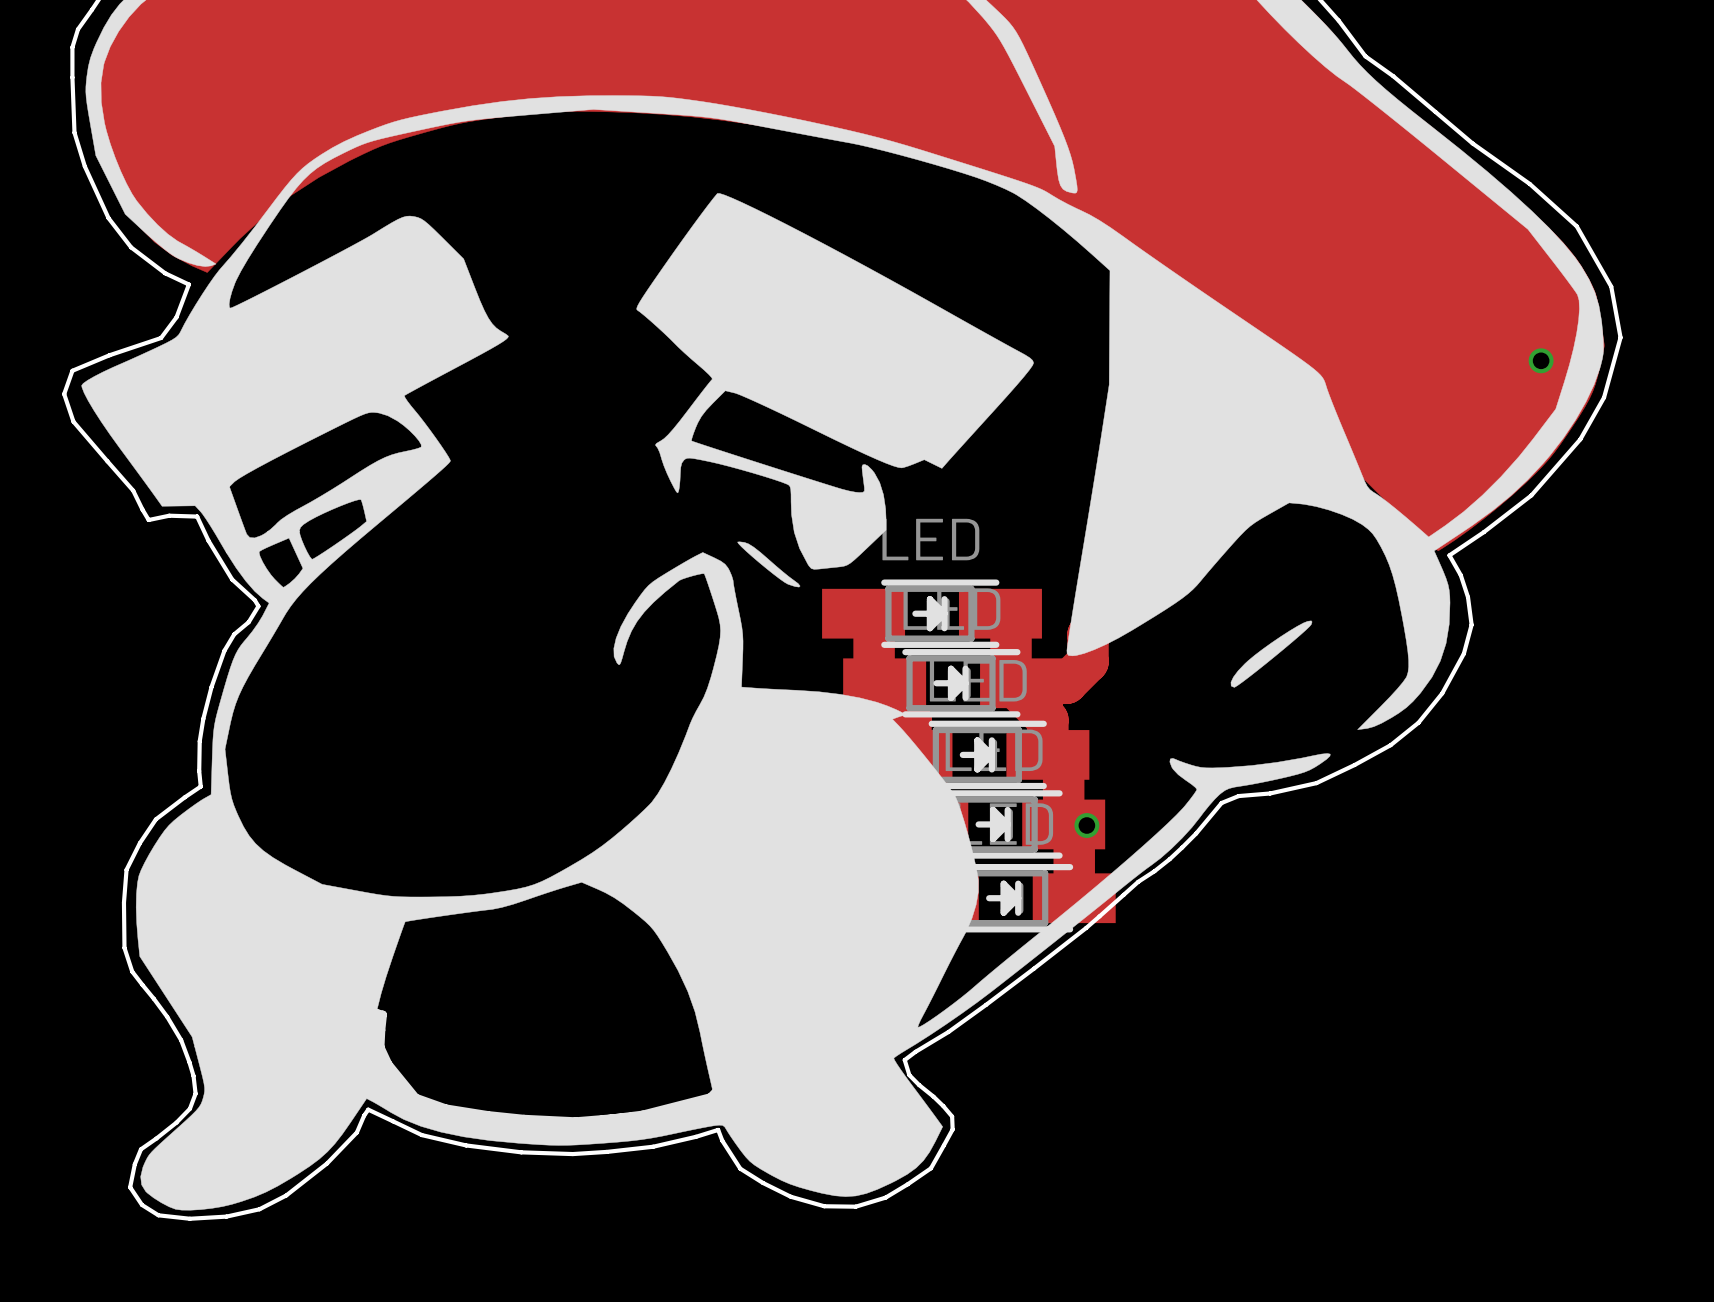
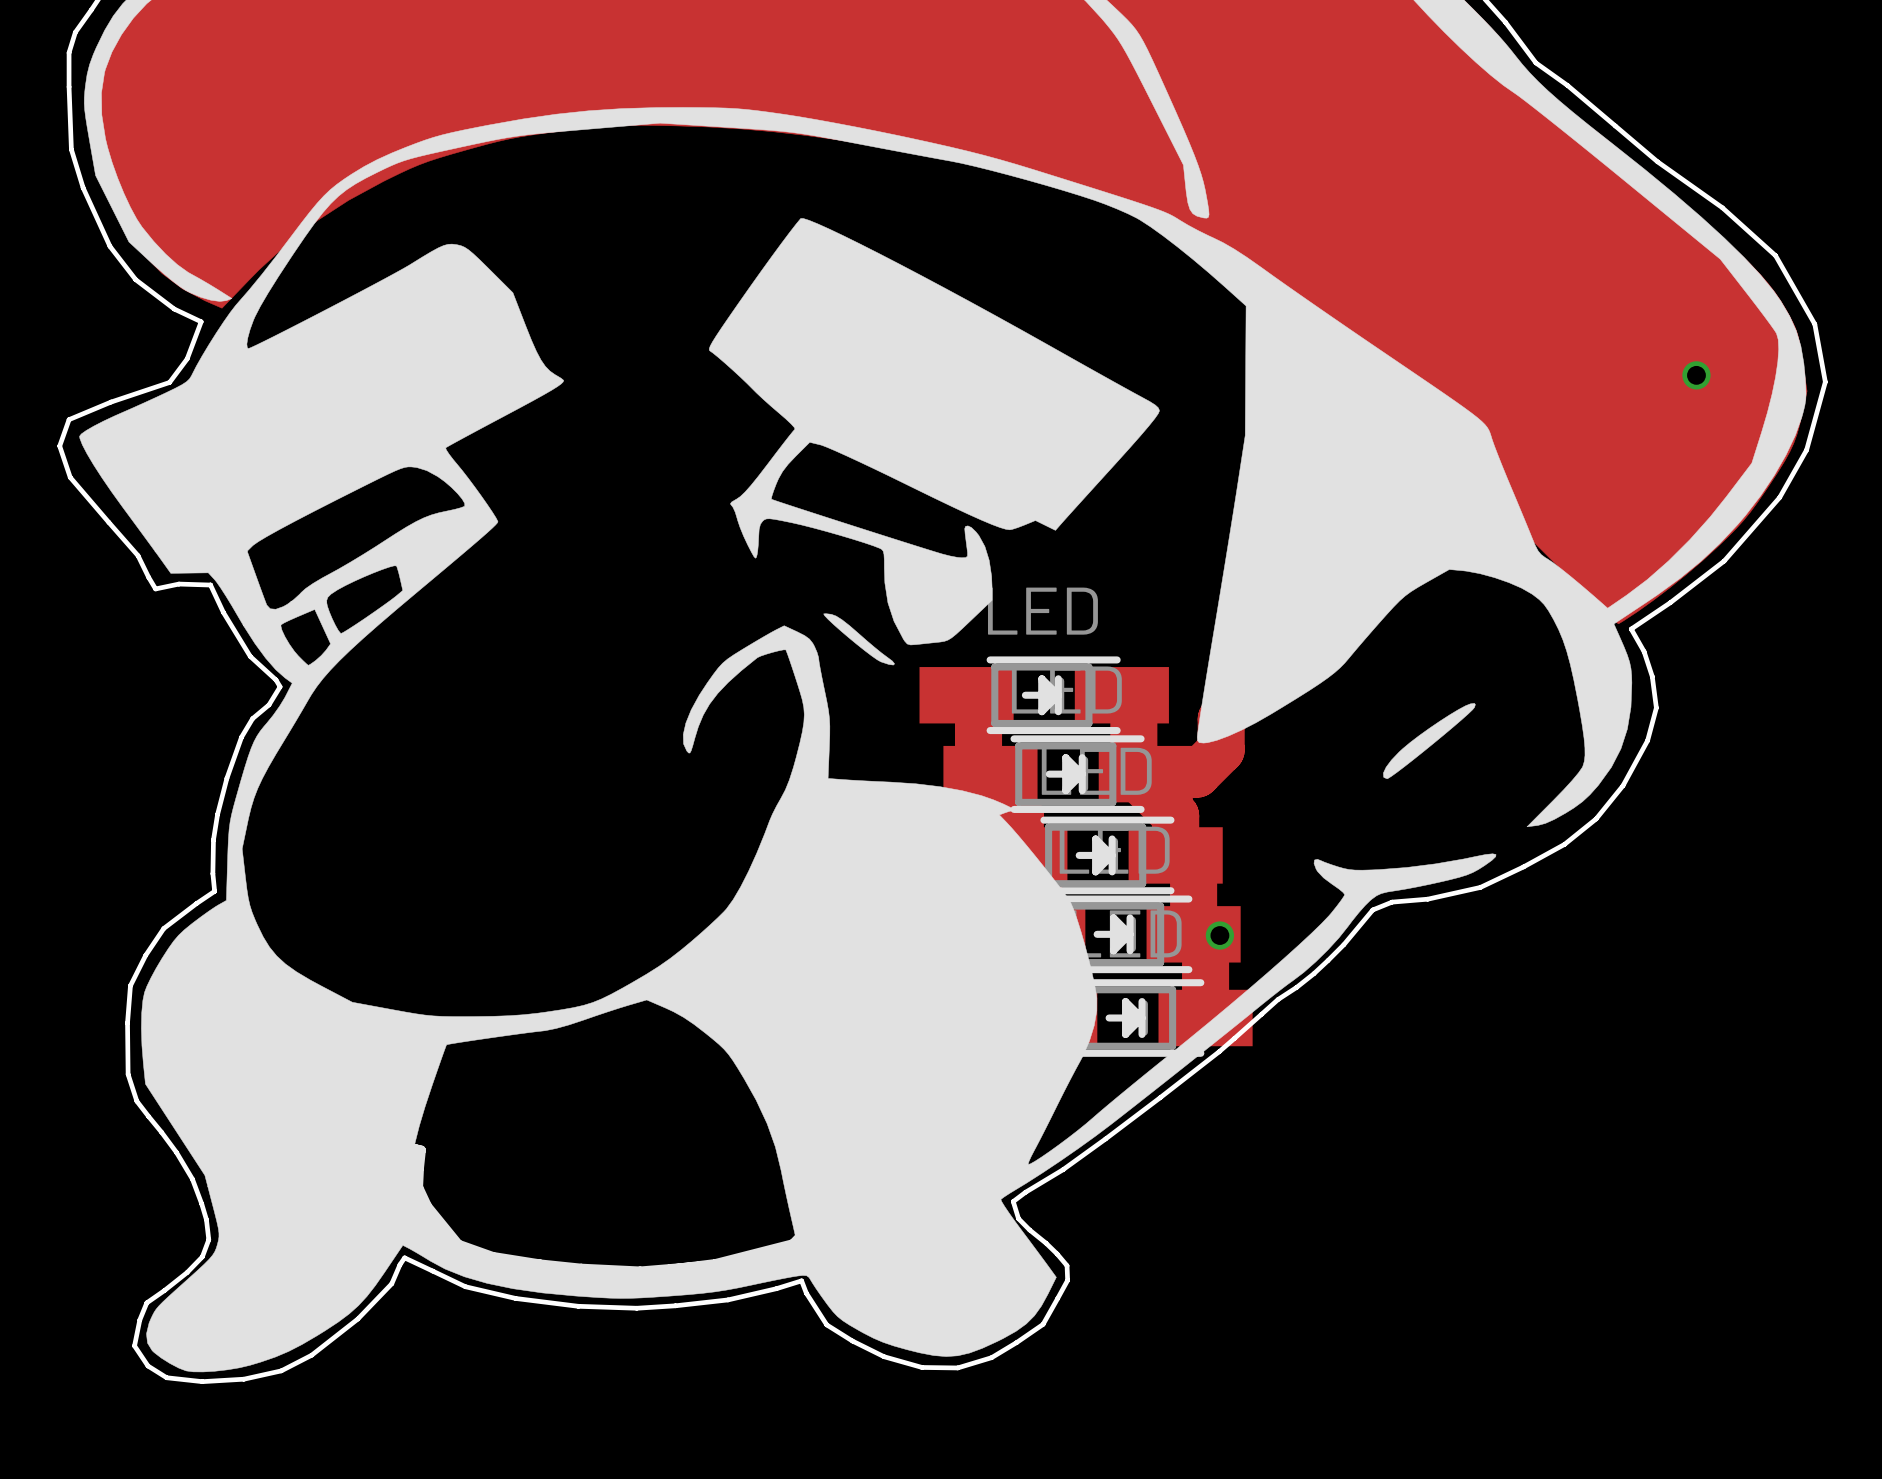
via position: (1541, 360) -> (1696, 375)

